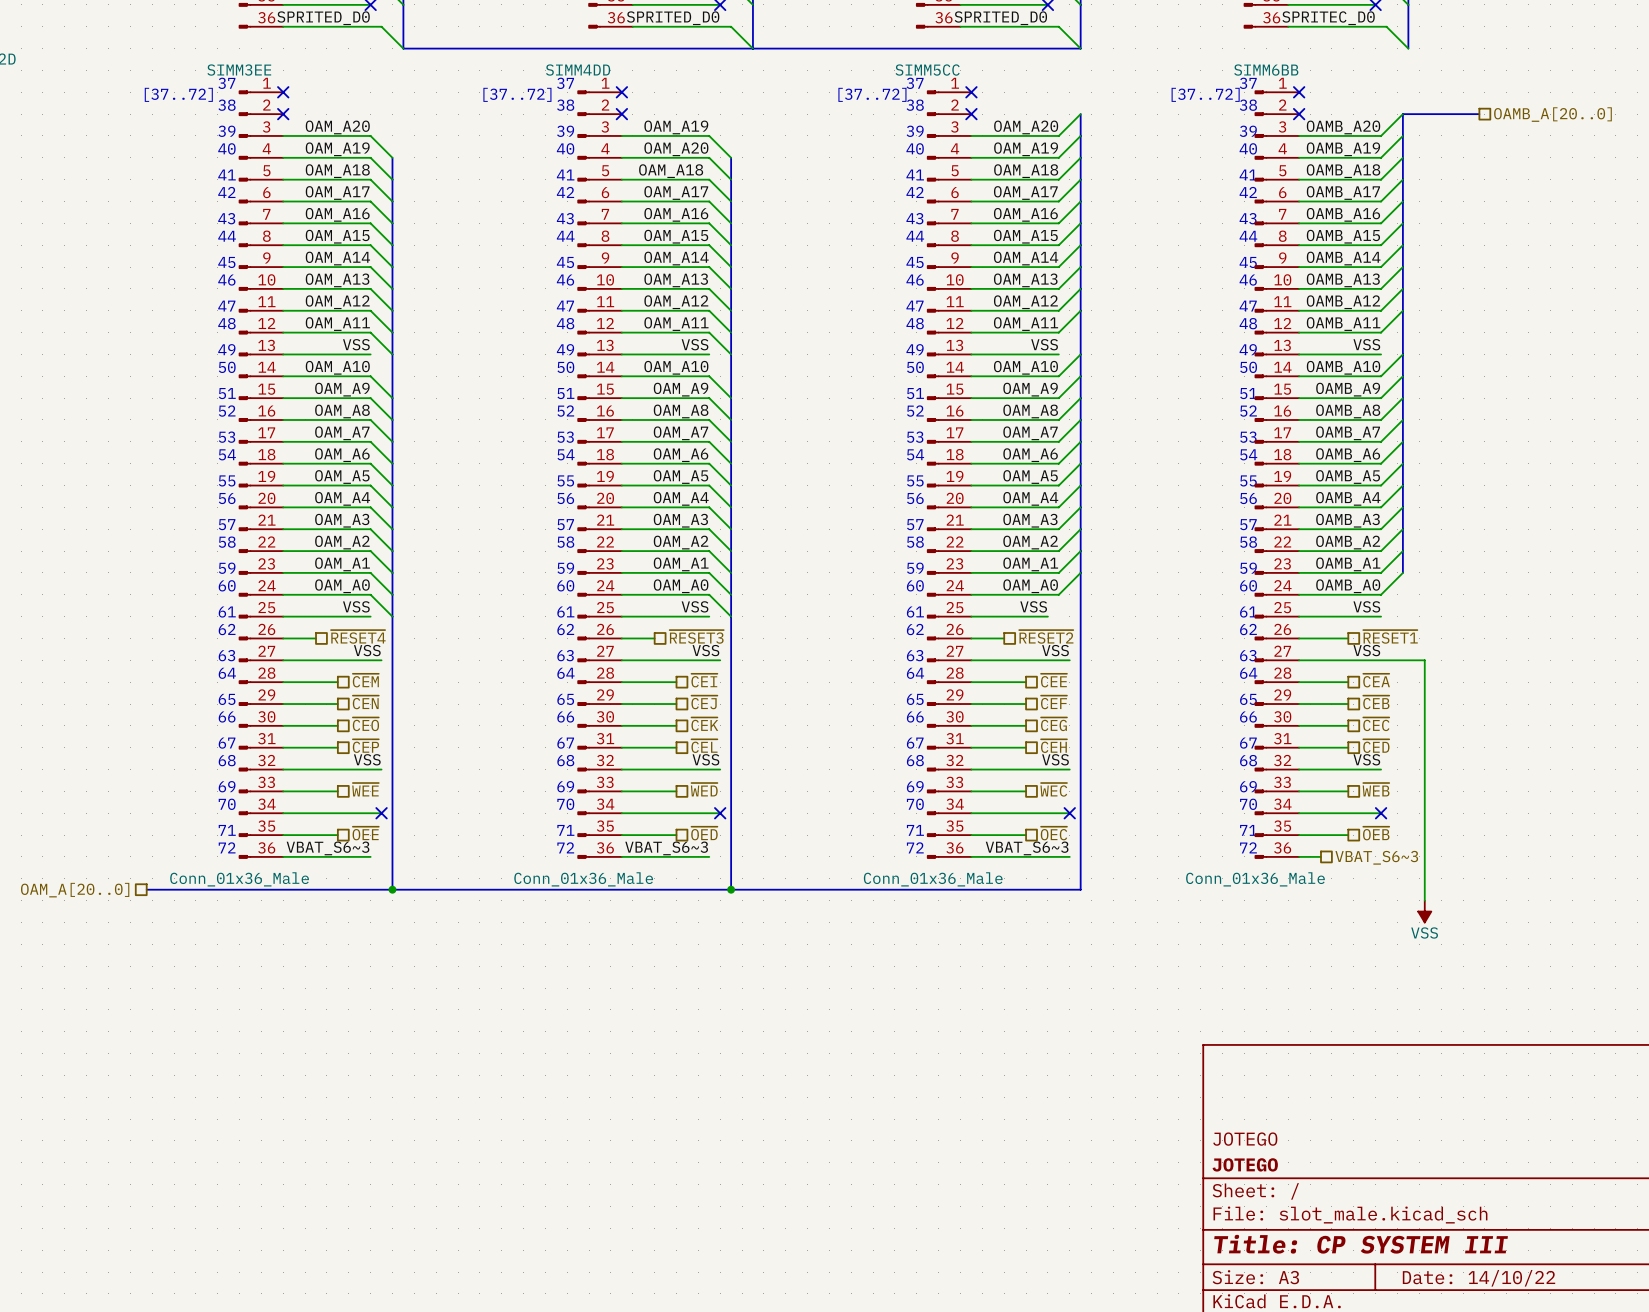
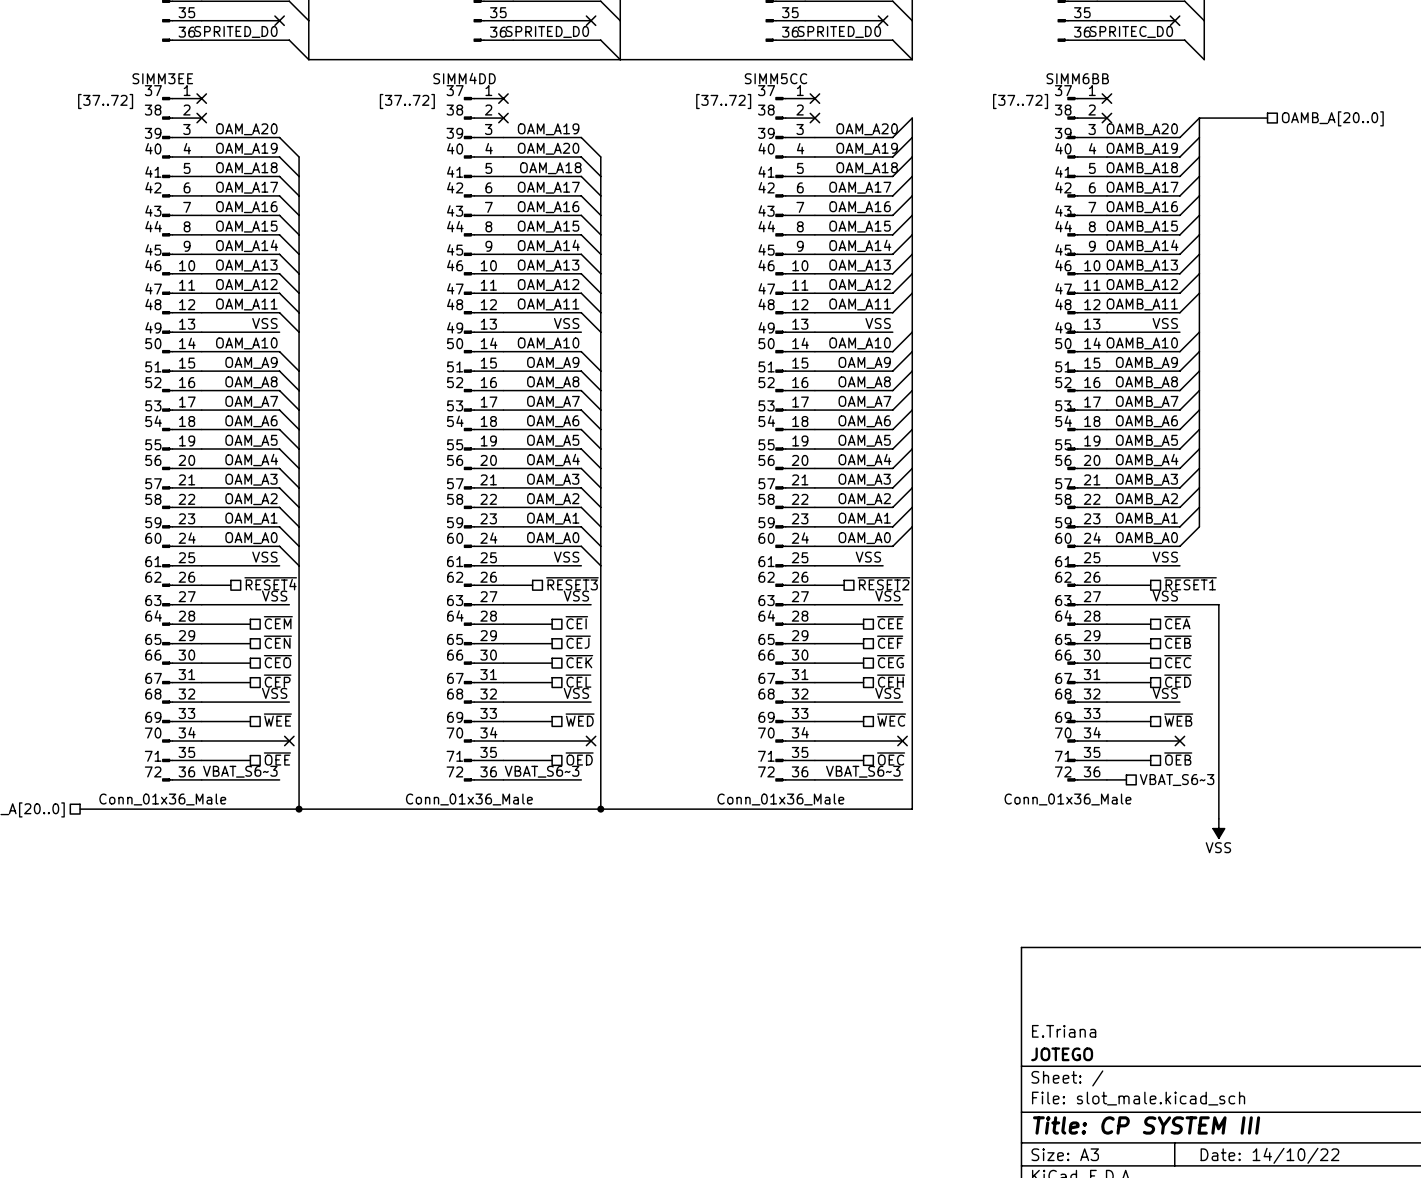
title block: JOTEGO (1245, 1139) -> E.Triana (1064, 1031)

